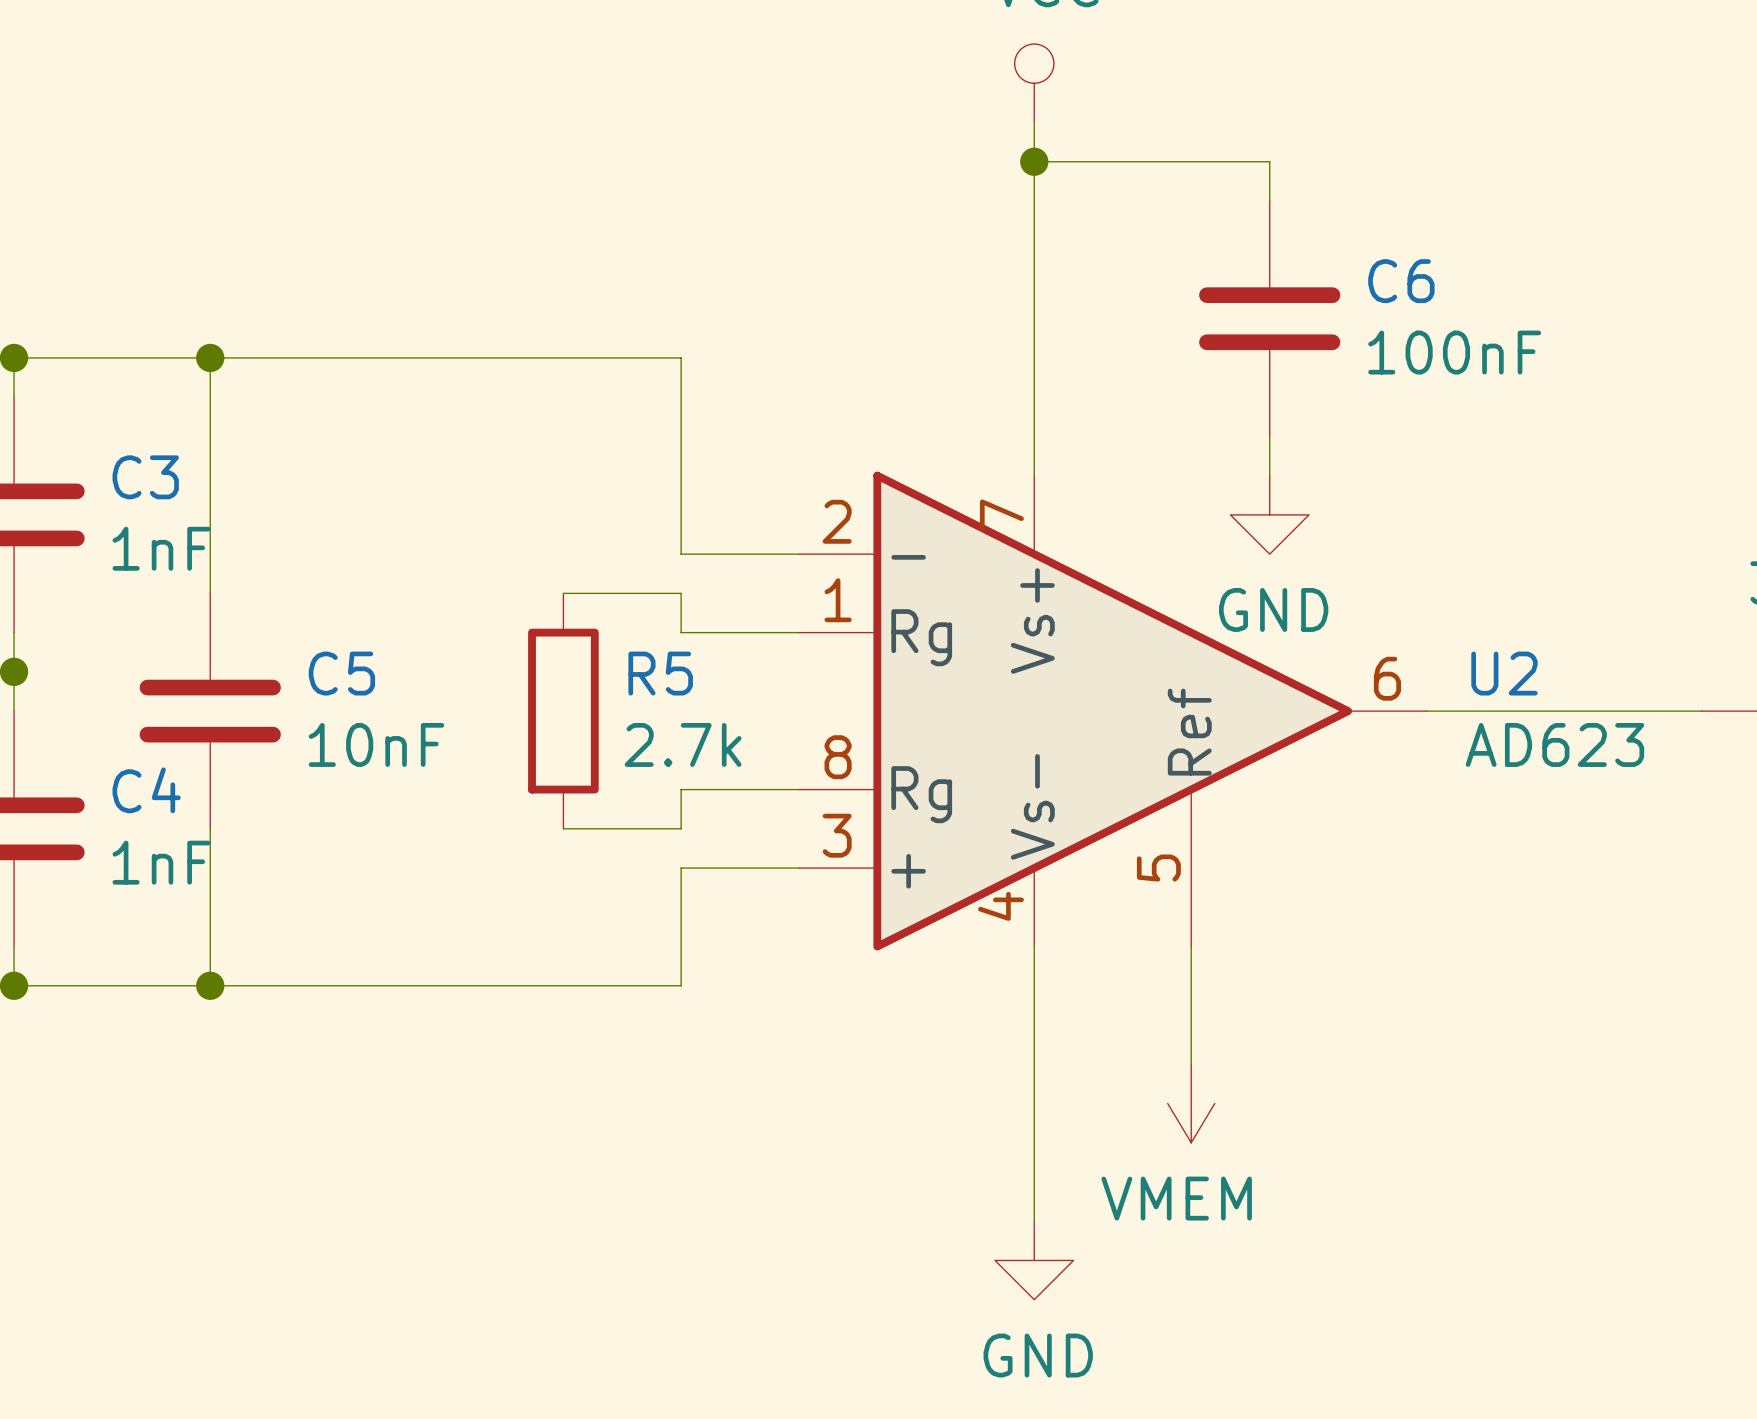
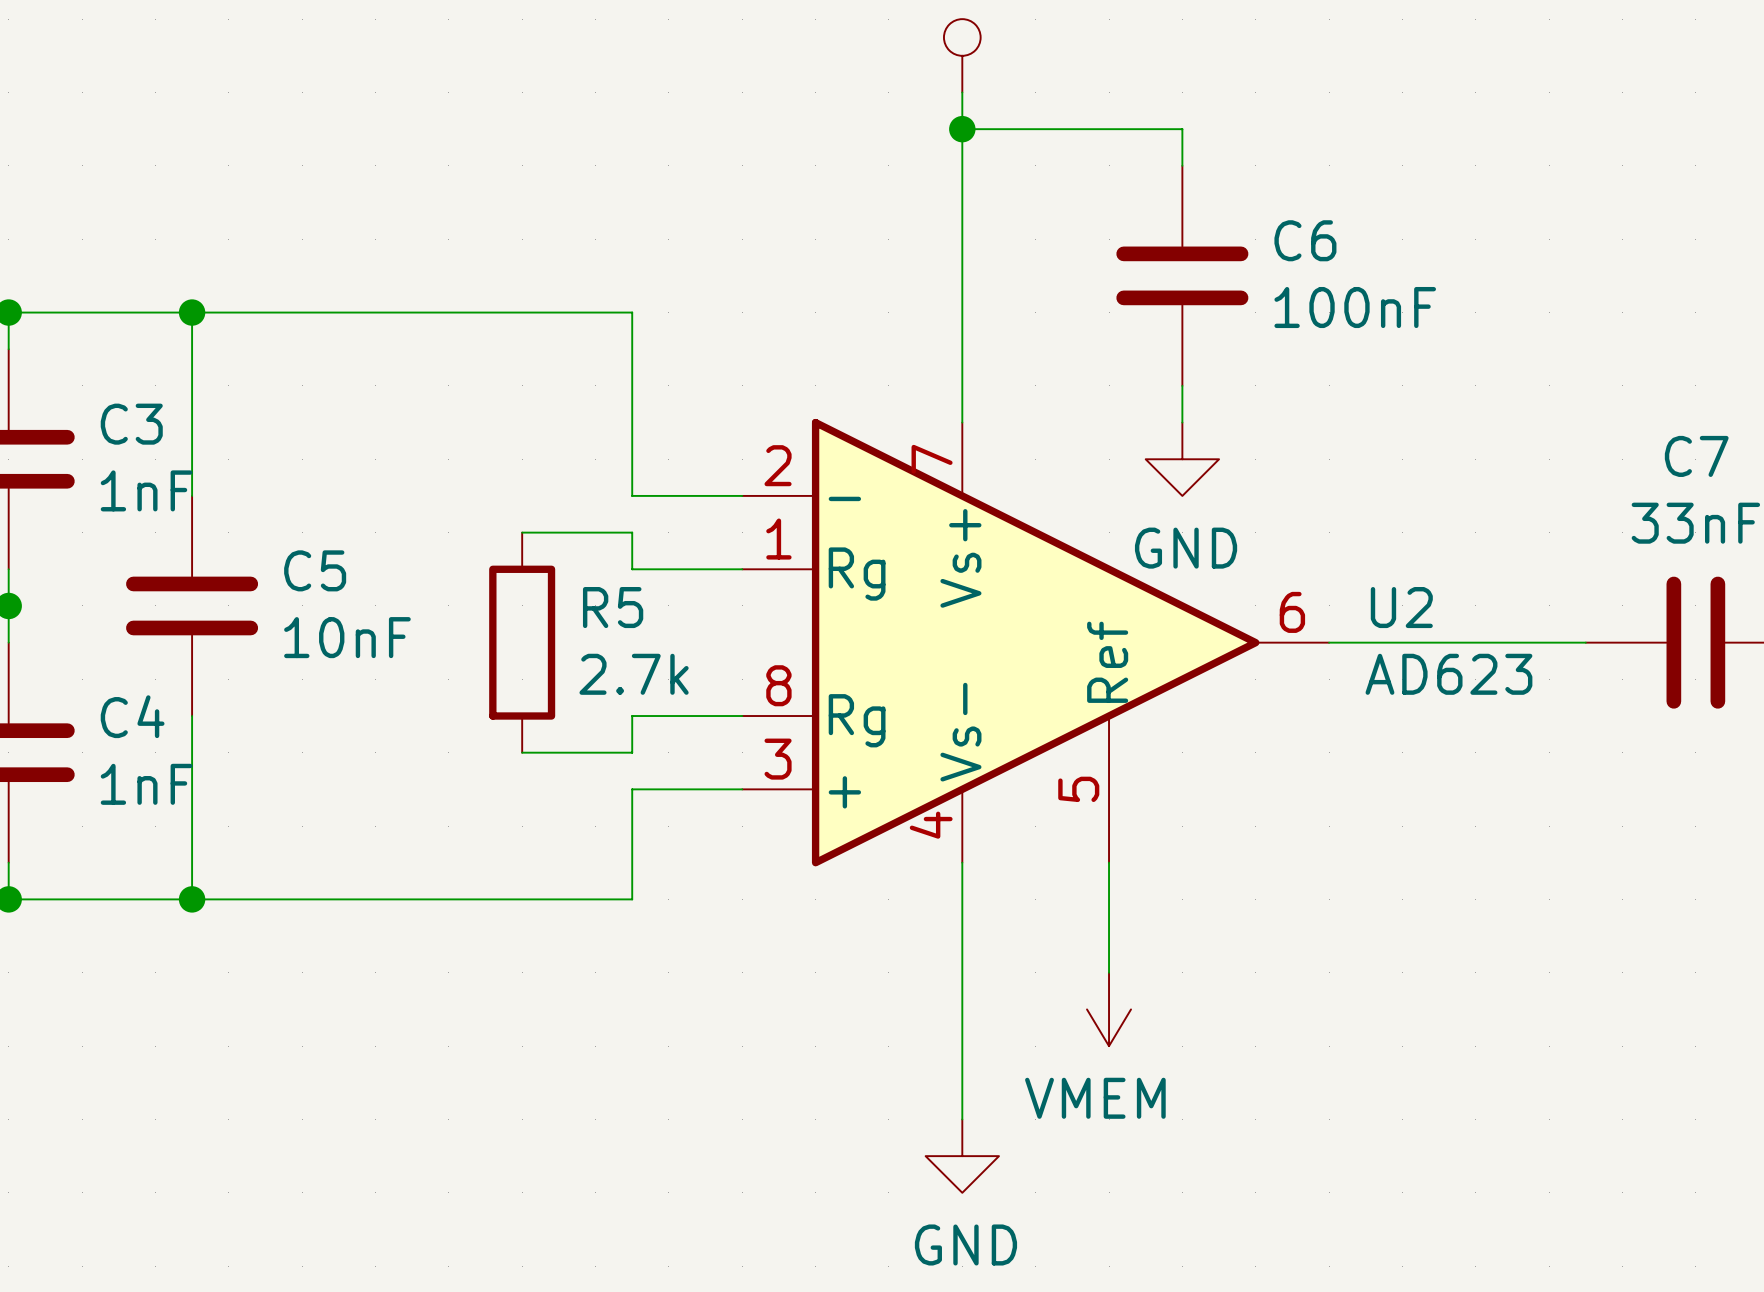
C5 position: (210, 711) -> (192, 605)

